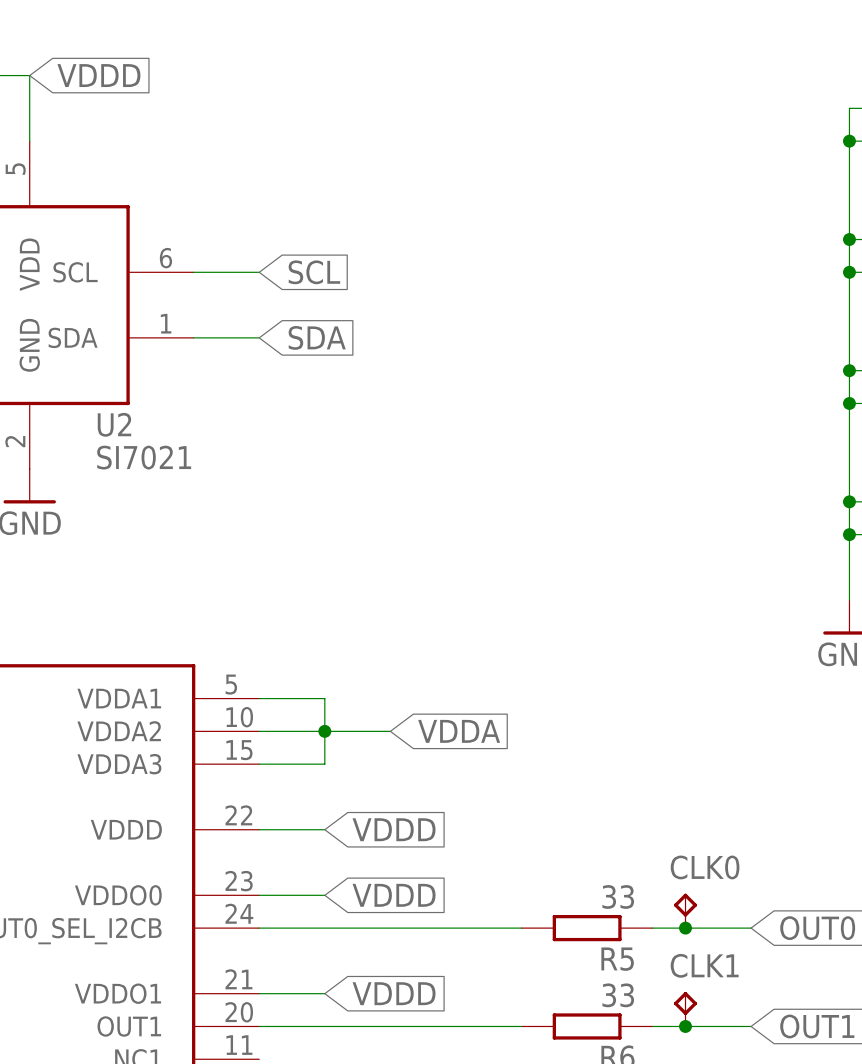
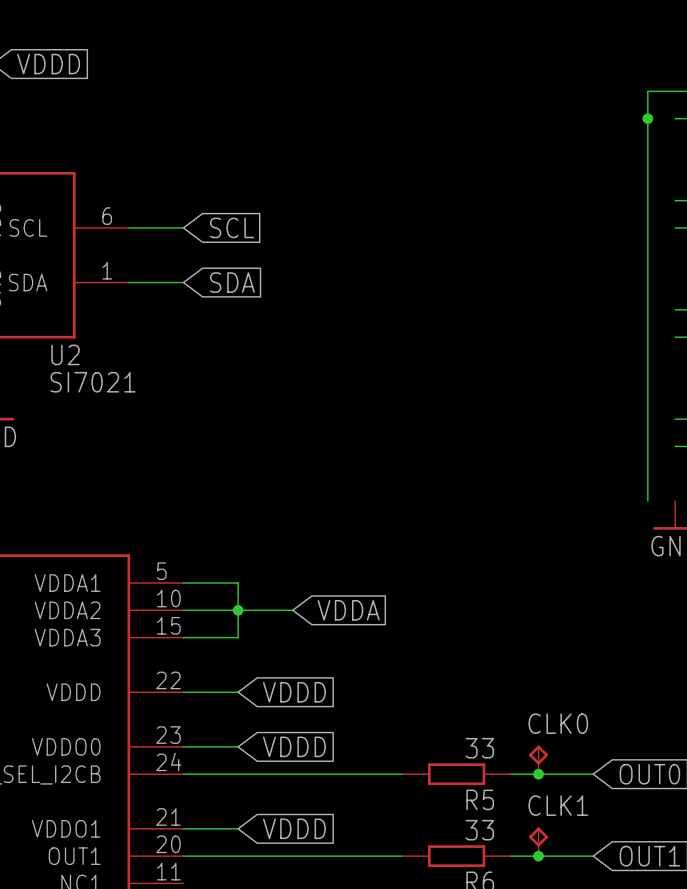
wire: (849, 108) (849, 600) -> (675, 91) (647, 91) (647, 501)
junction position: (849, 141) -> (647, 118)
junction: (849, 239) -> none
junction: (849, 272) -> none
junction: (849, 370) -> none
junction: (849, 403) -> none
junction: (849, 501) -> none
junction: (849, 534) -> none

